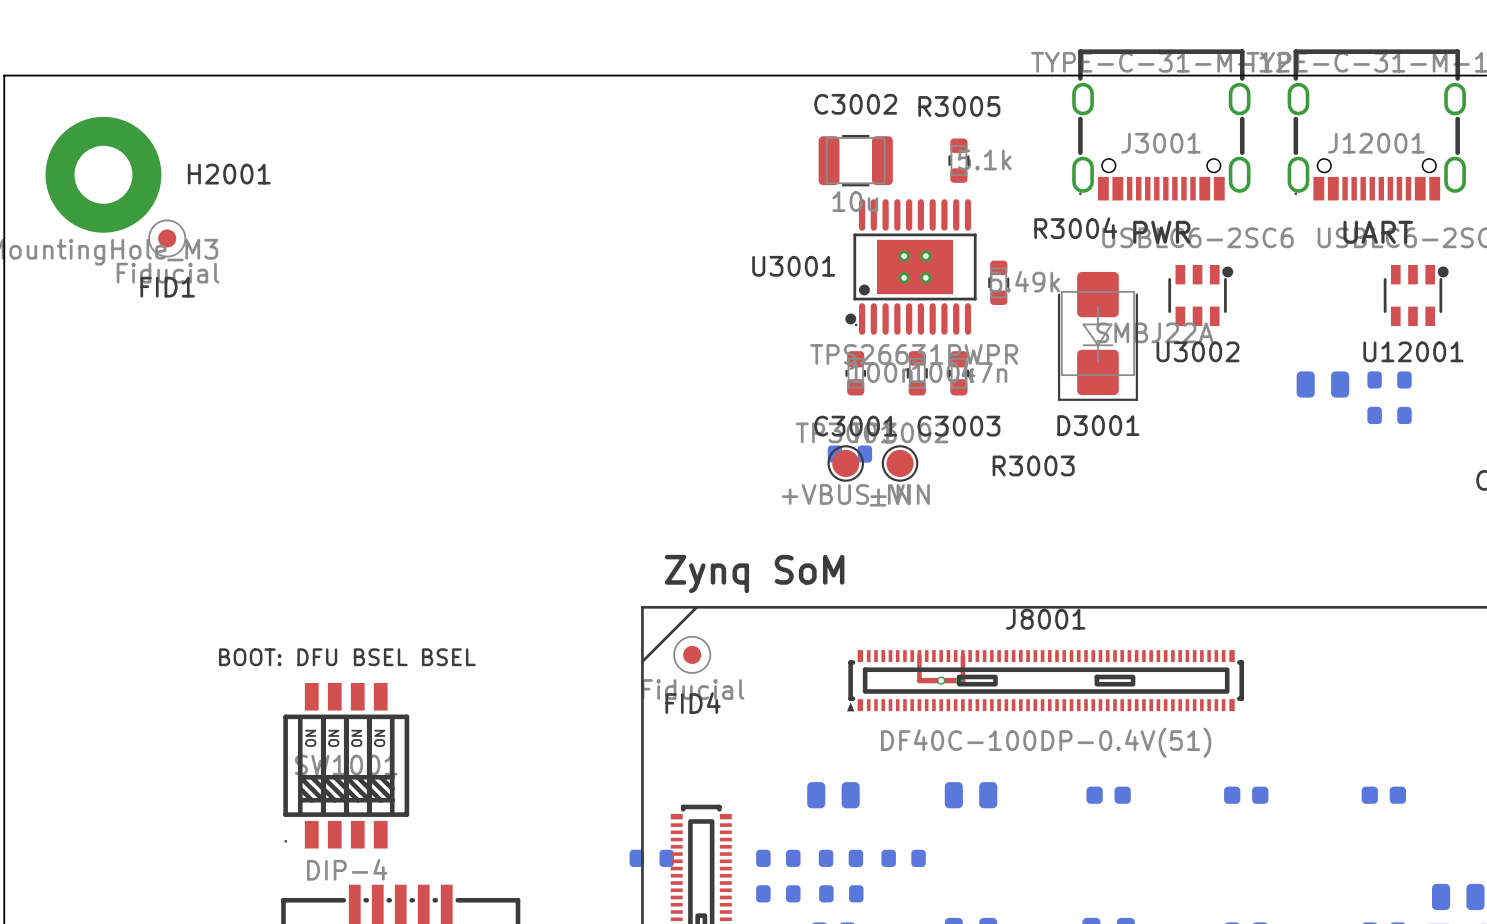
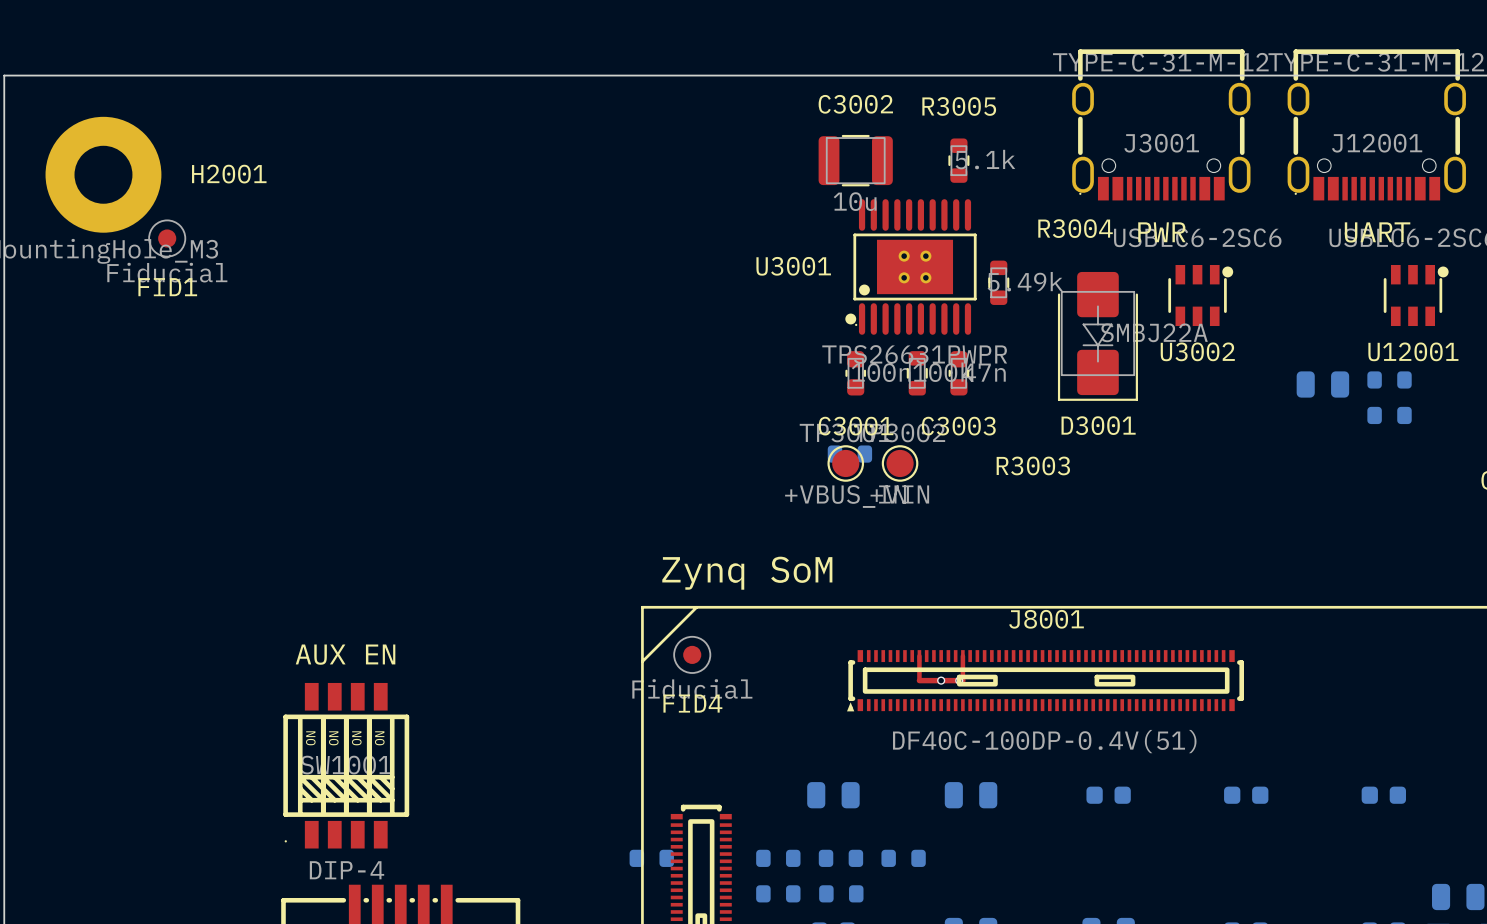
text: BOOT: DFU BSEL BSEL (347, 657) -> AUX EN (345, 654)

